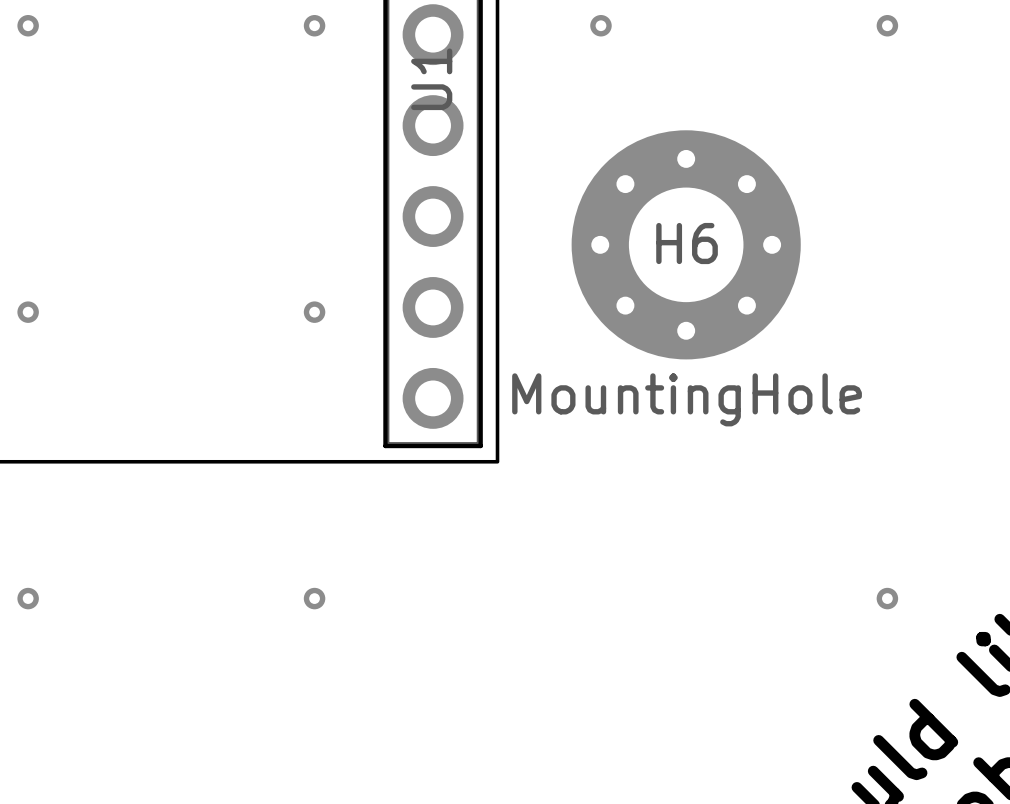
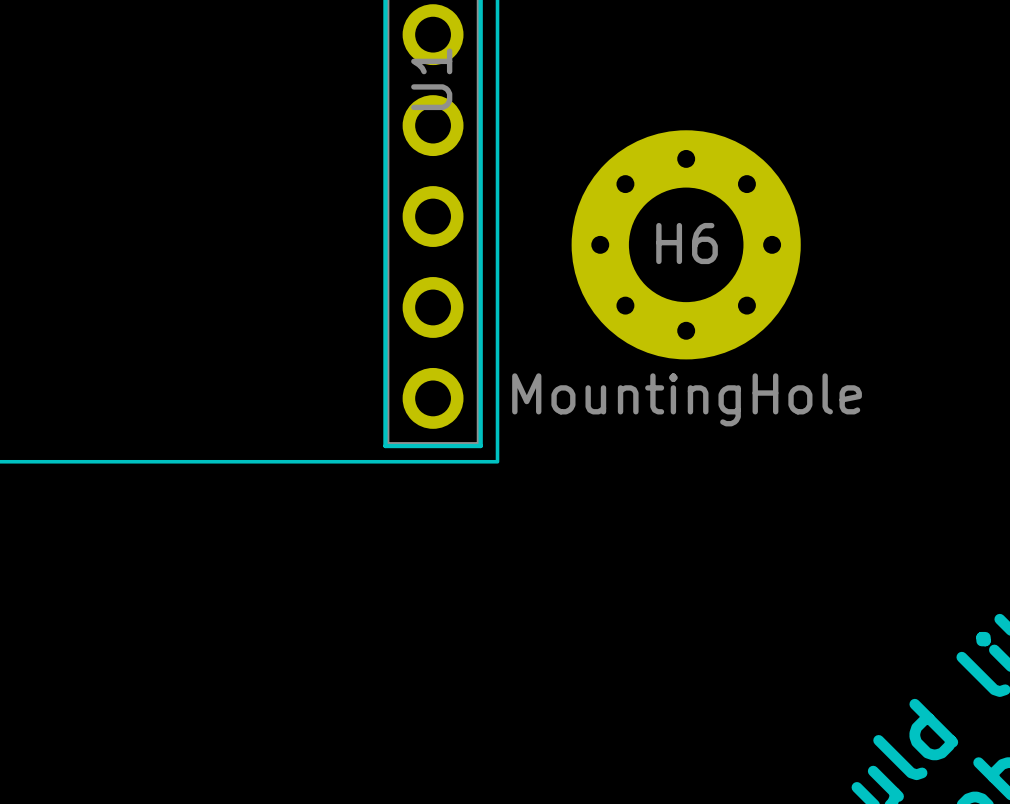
via: (28, 25) -> none
via: (314, 25) -> none
via: (600, 25) -> none
via: (887, 25) -> none
via: (28, 312) -> none
via: (314, 312) -> none
via: (28, 598) -> none
via: (314, 598) -> none
via: (887, 598) -> none

